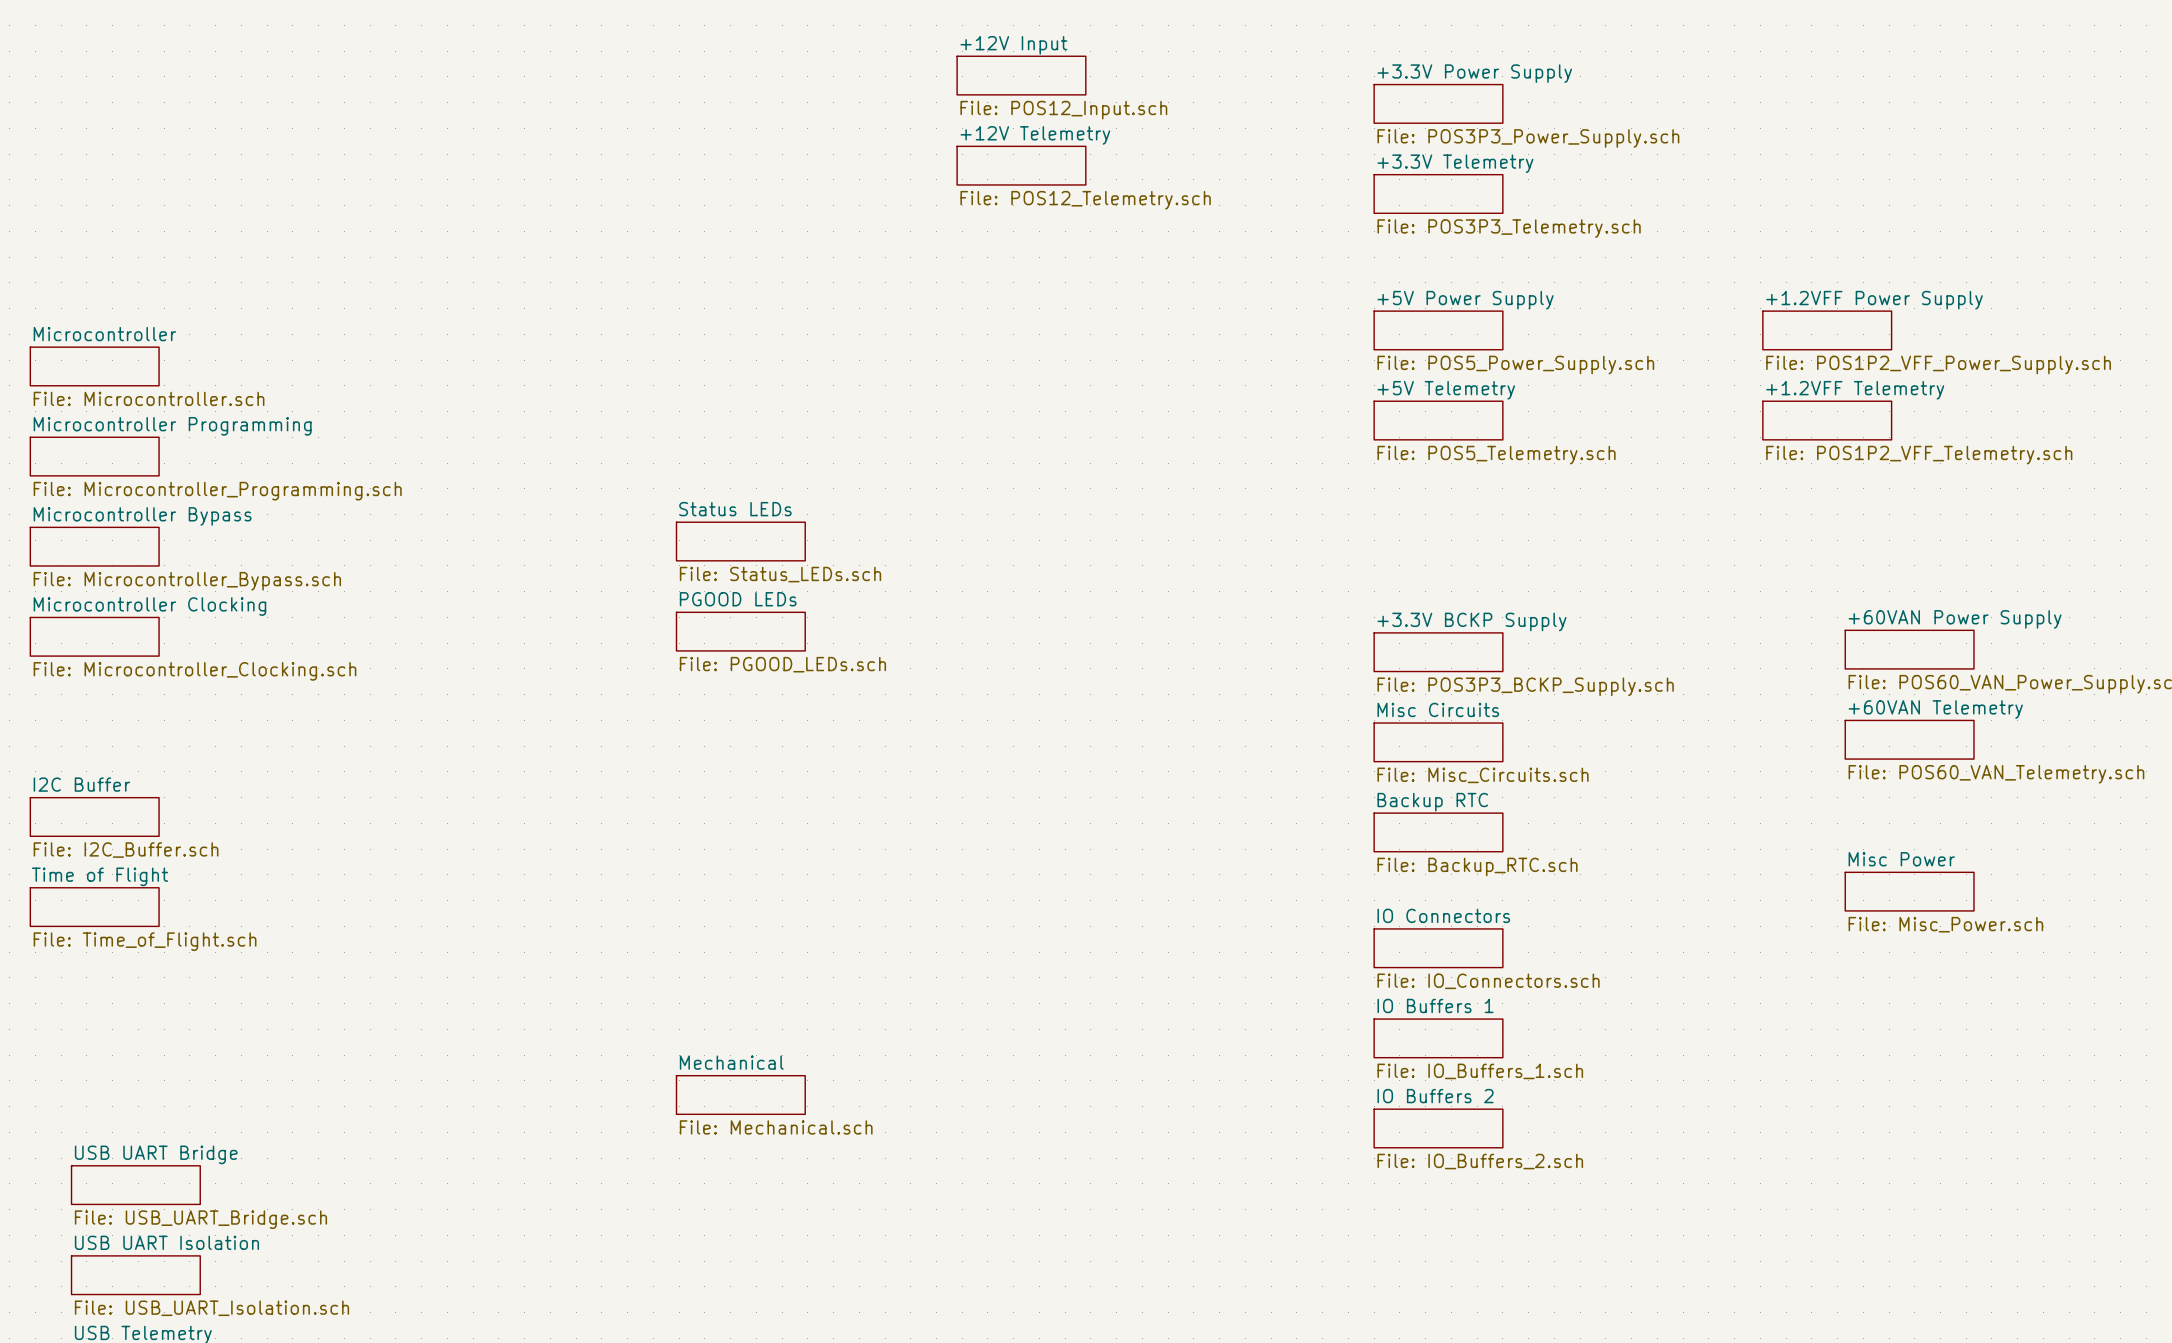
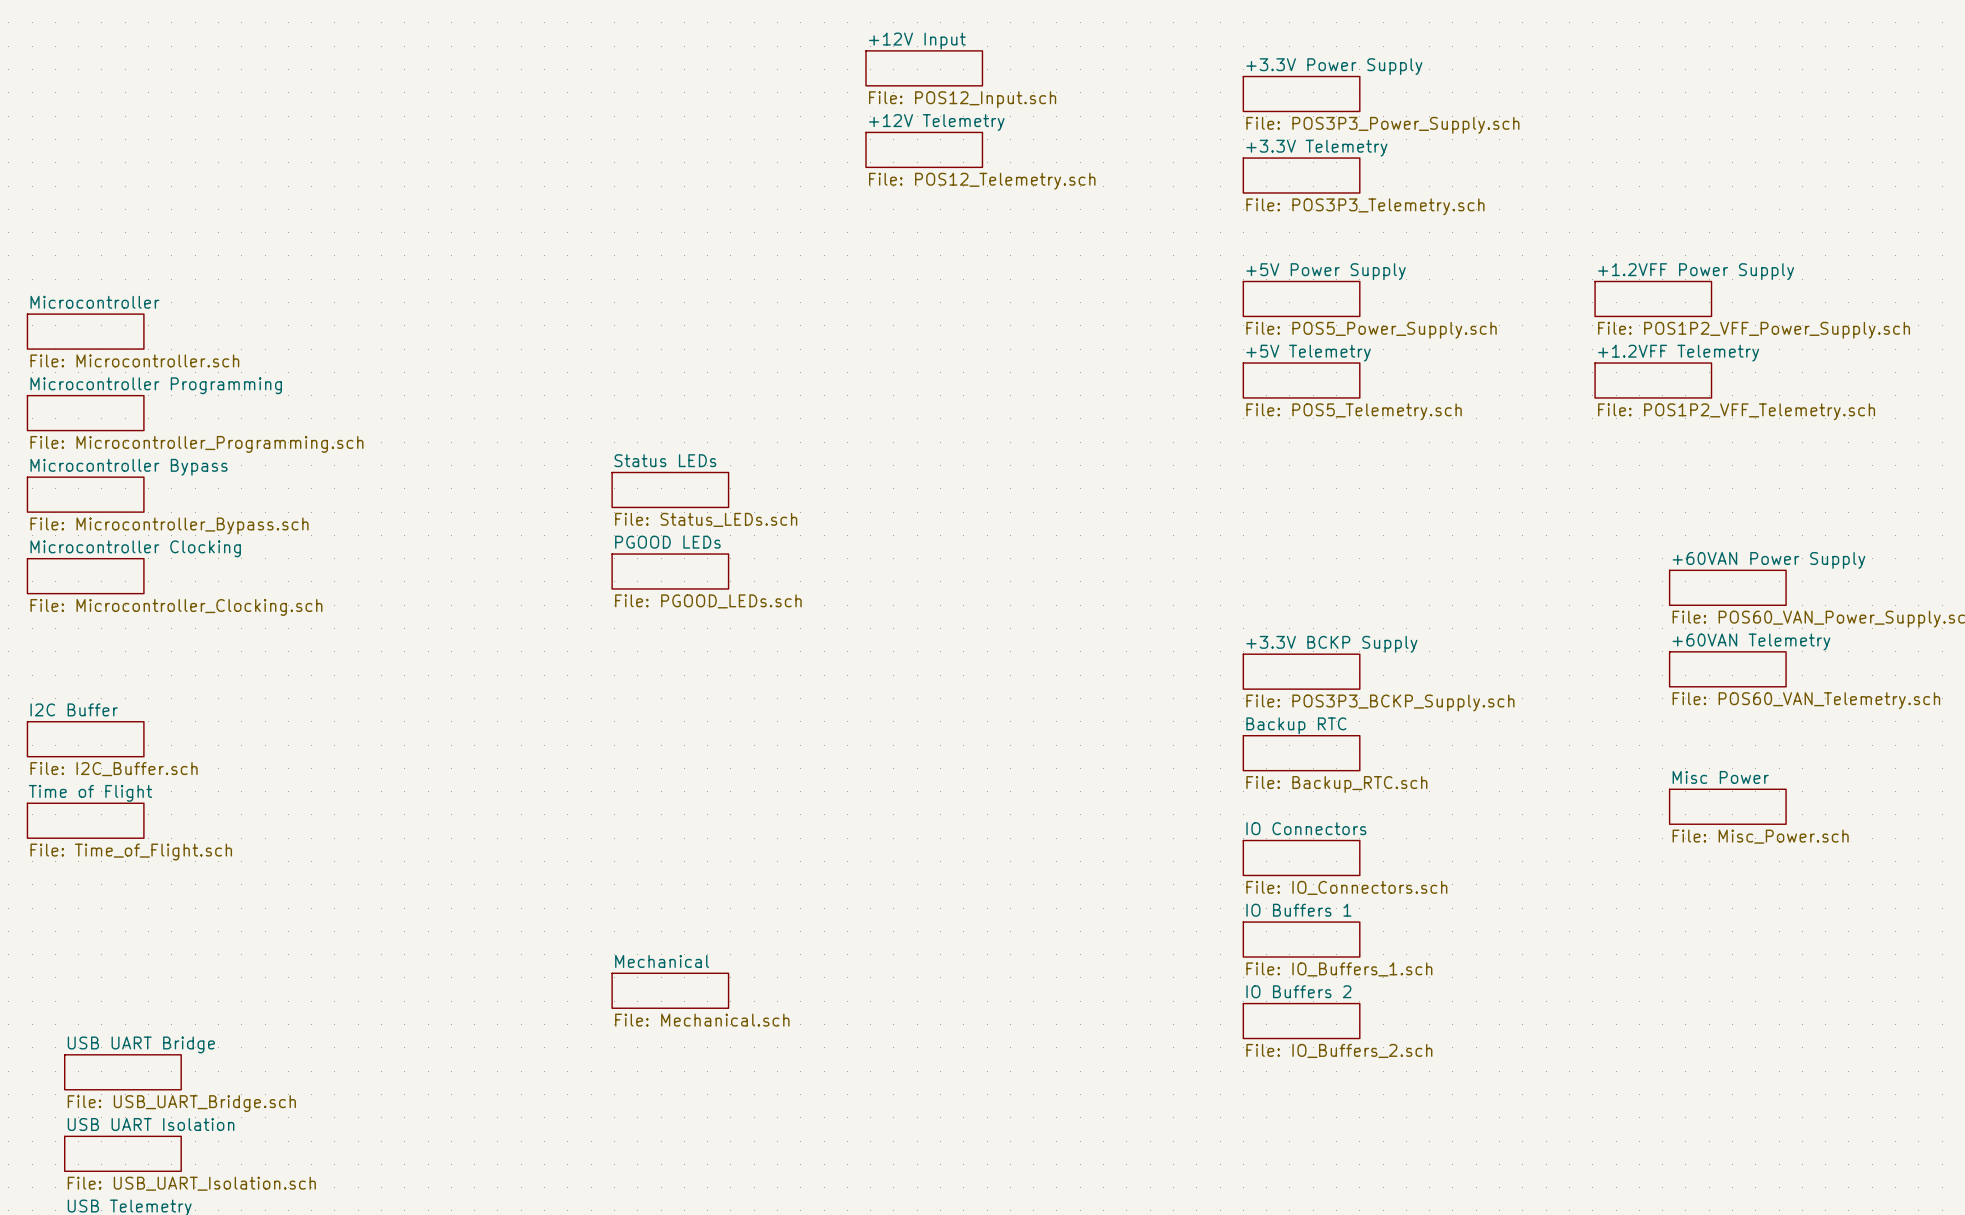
sheet +3.3V BCKP Supply: File: POS3P3_BCKP_Supply.sch (1438, 652) -> none
sheet Misc Circuits name: Misc Circuits (1438, 709) -> +3.3V BCKP Supply (1331, 644)
sheet Misc Circuits value: File: Misc_Circuits.sch (1483, 775) -> File: POS3P3_BCKP_Supply.sch (1380, 702)

